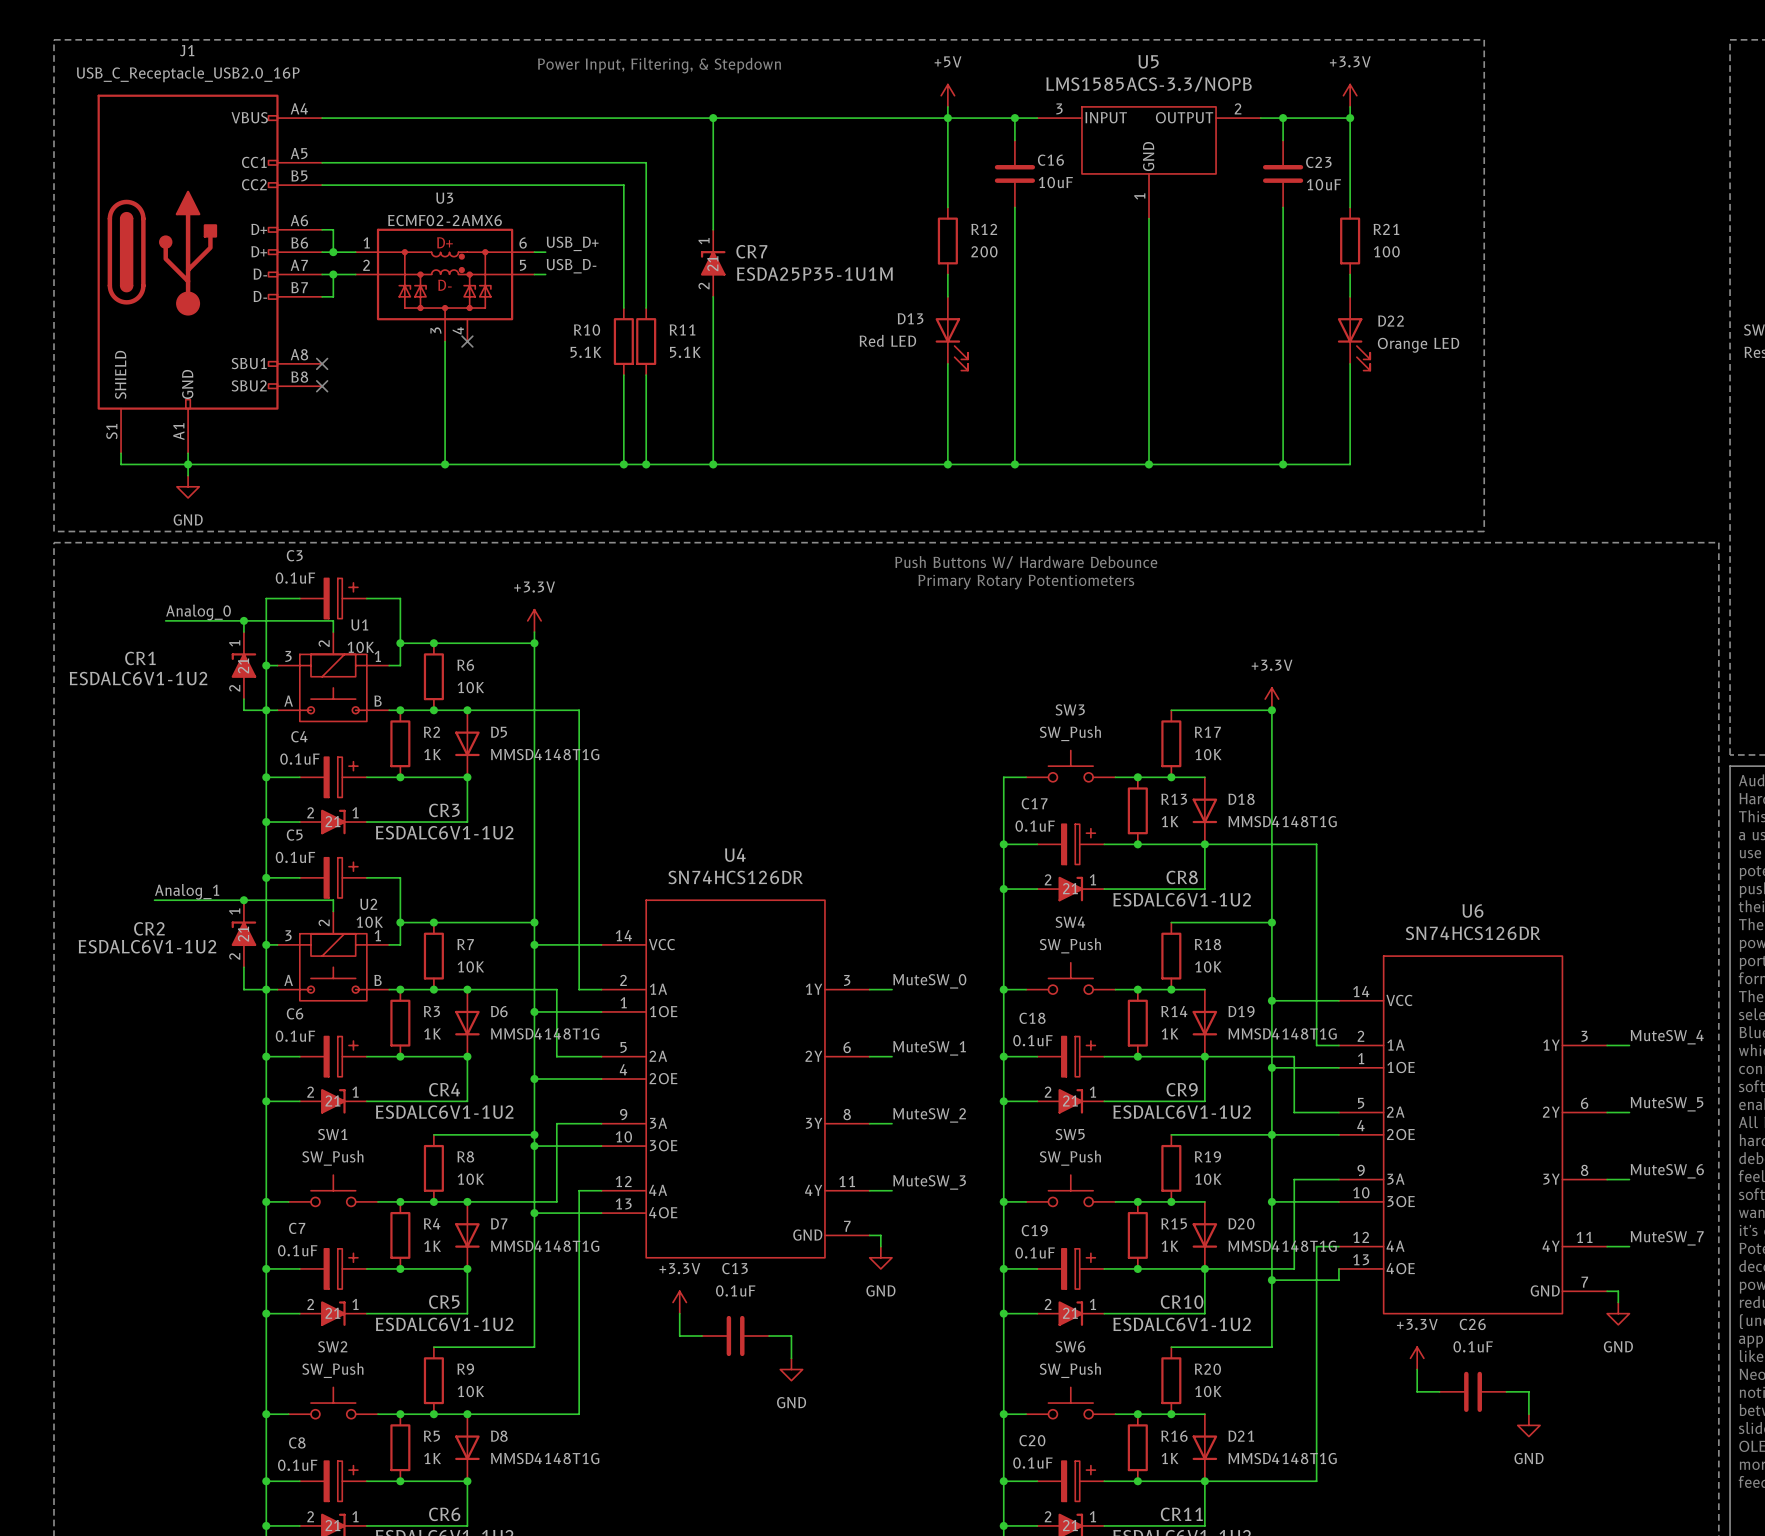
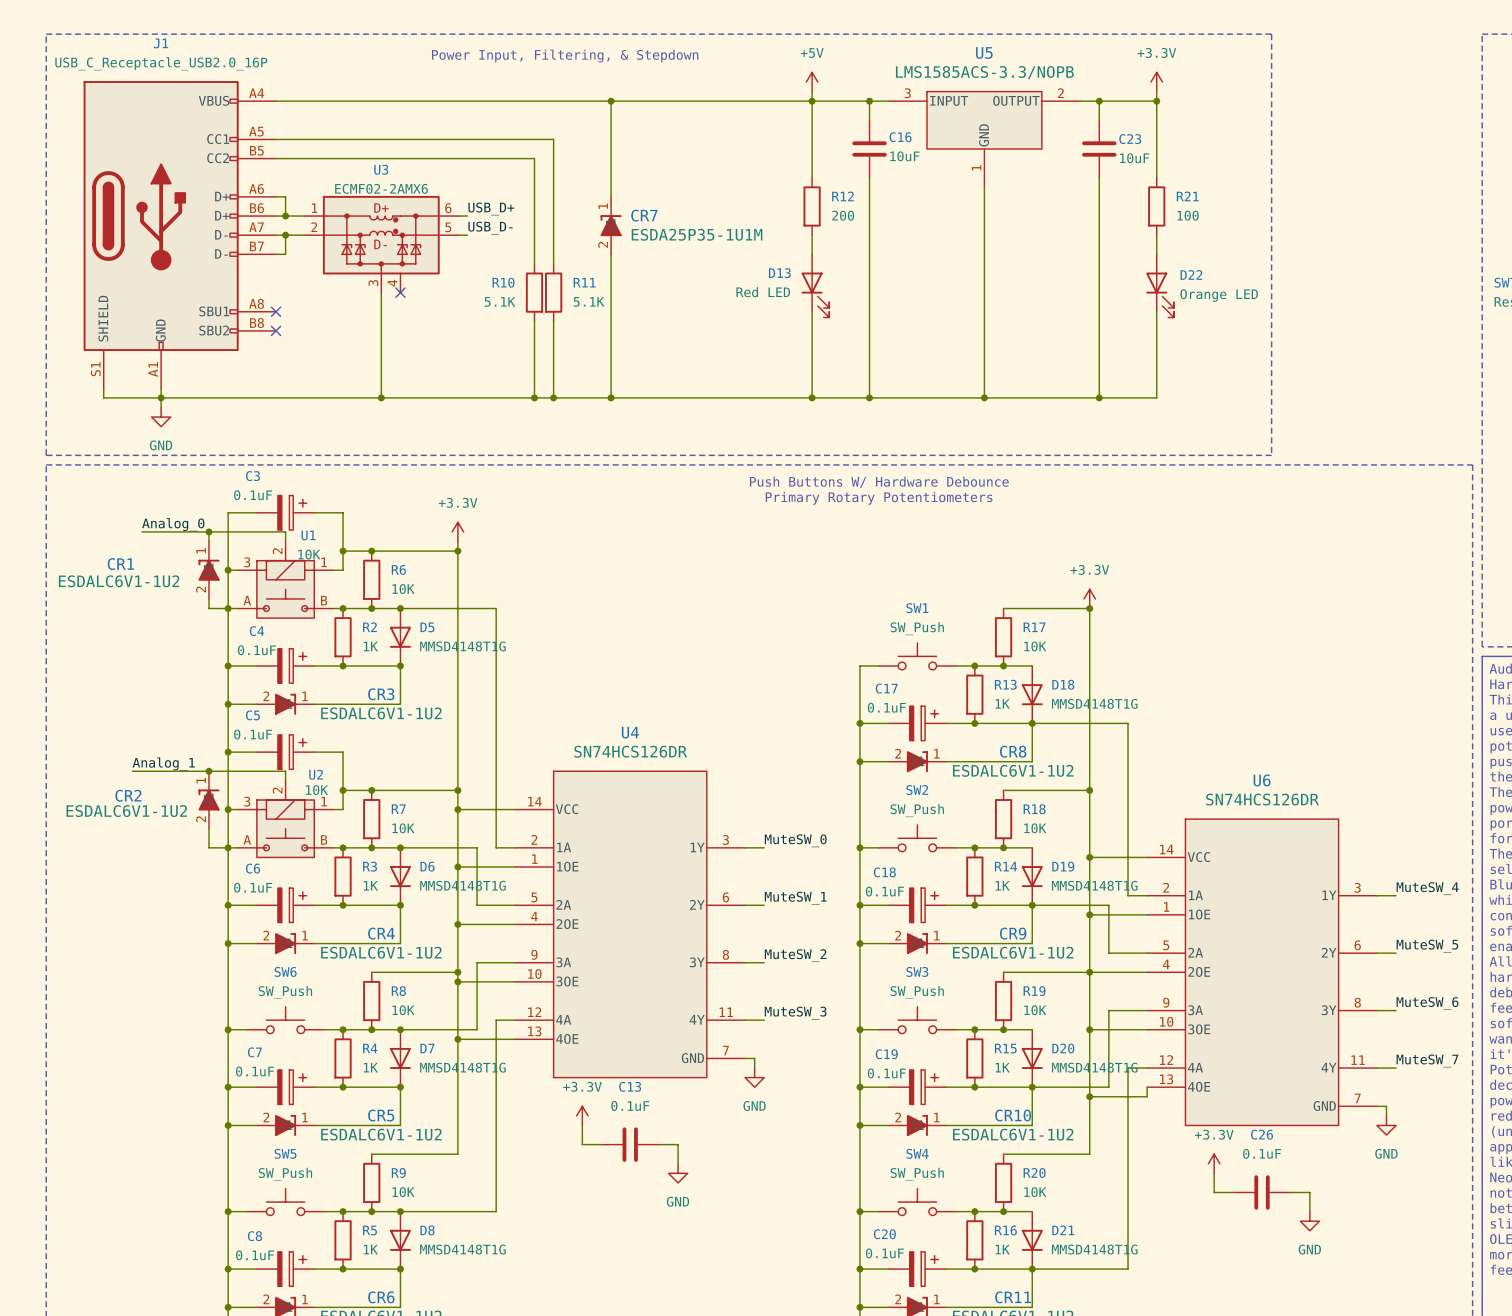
SW3 name: SW3 (1070, 709) -> SW1 (917, 608)
SW4 name: SW4 (1070, 922) -> SW2 (917, 790)
SW1 name: SW1 (332, 1134) -> SW6 (285, 971)
SW5 name: SW5 (1070, 1134) -> SW3 (917, 971)
SW2 name: SW2 (332, 1346) -> SW5 (285, 1153)
SW6 name: SW6 (1070, 1346) -> SW4 (917, 1153)

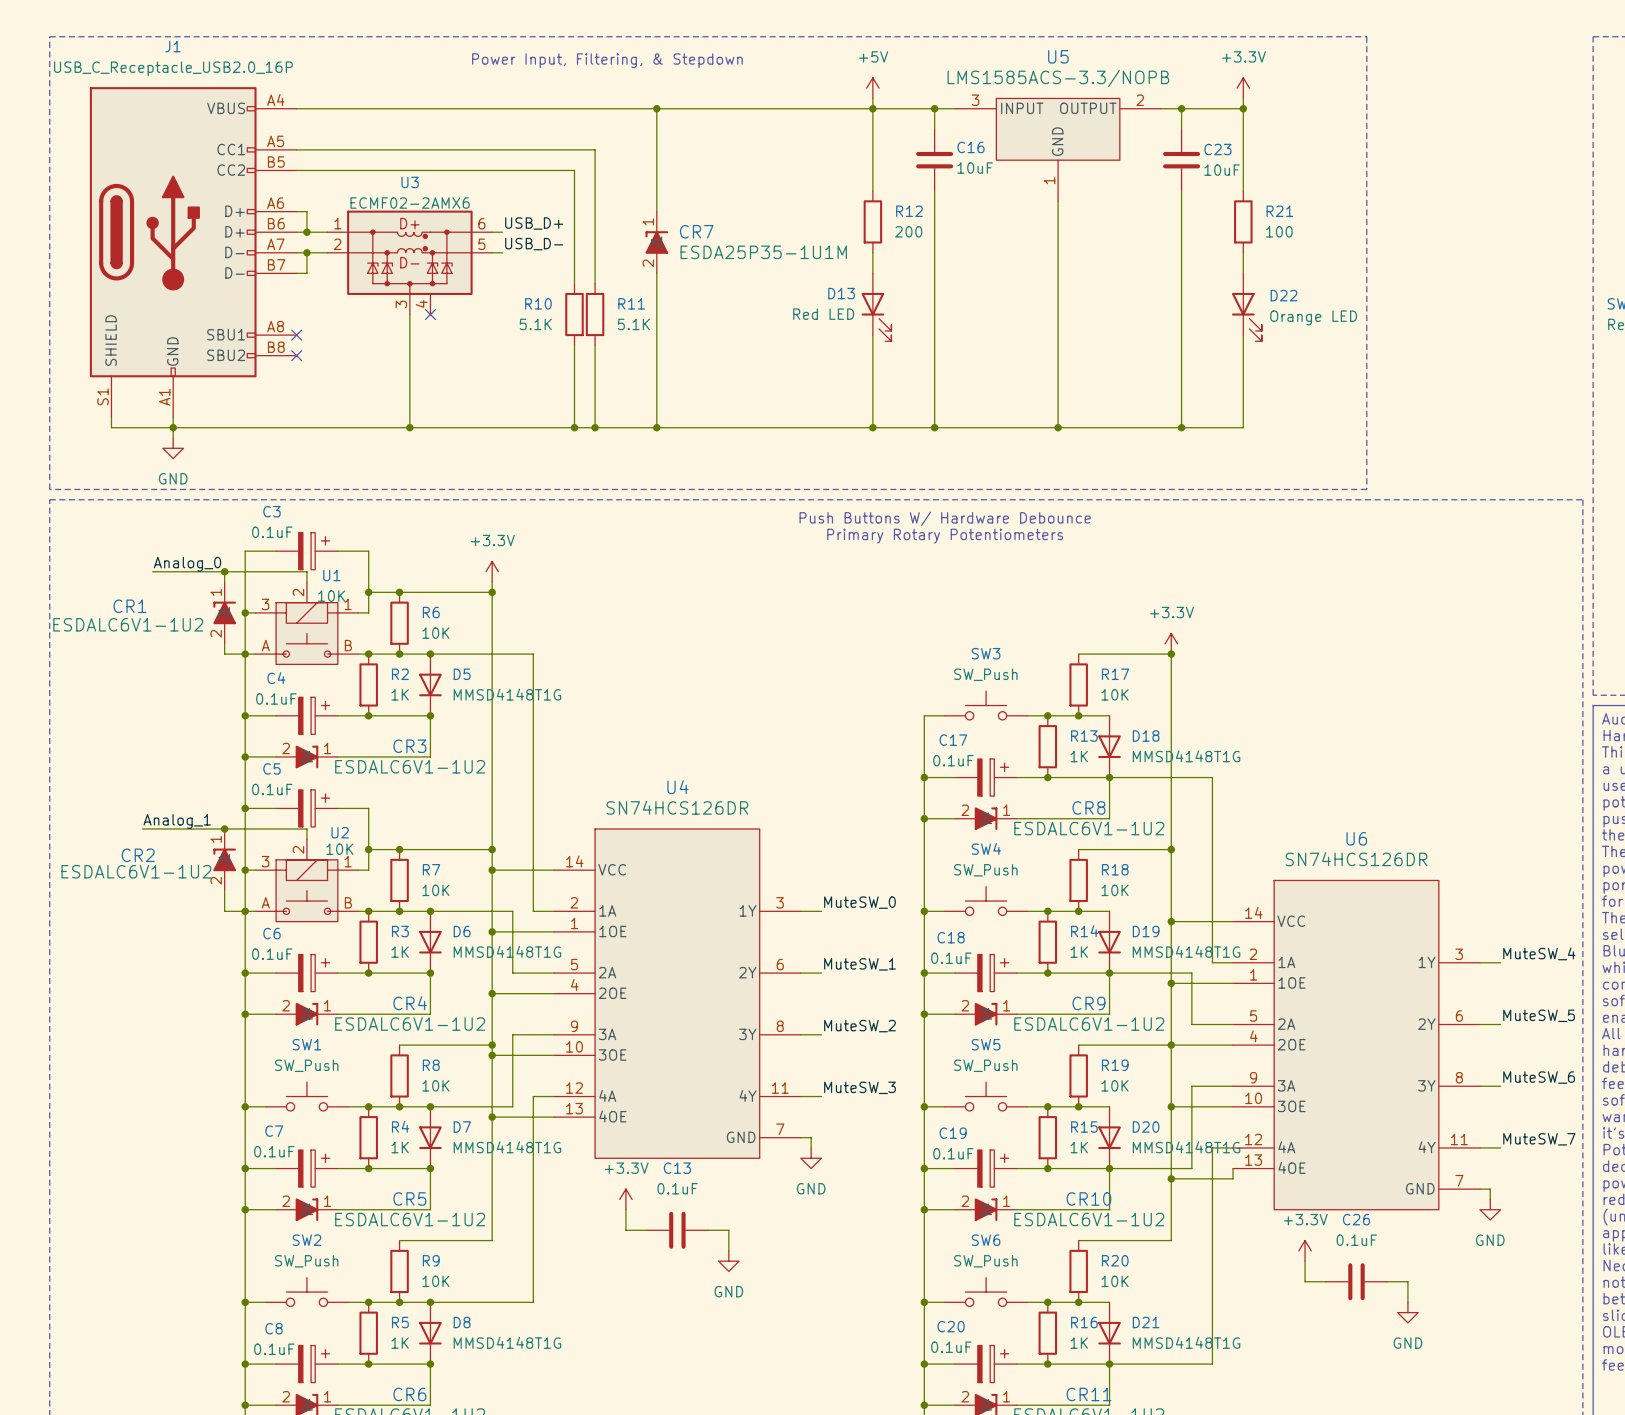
SW1 name: SW1 (917, 608) -> SW3 (986, 653)
SW2 name: SW2 (917, 790) -> SW4 (986, 848)
SW6 name: SW6 (285, 971) -> SW1 (306, 1044)
SW3 name: SW3 (917, 971) -> SW5 (986, 1044)
SW5 name: SW5 (285, 1153) -> SW2 (306, 1240)
SW4 name: SW4 (917, 1153) -> SW6 (986, 1240)

